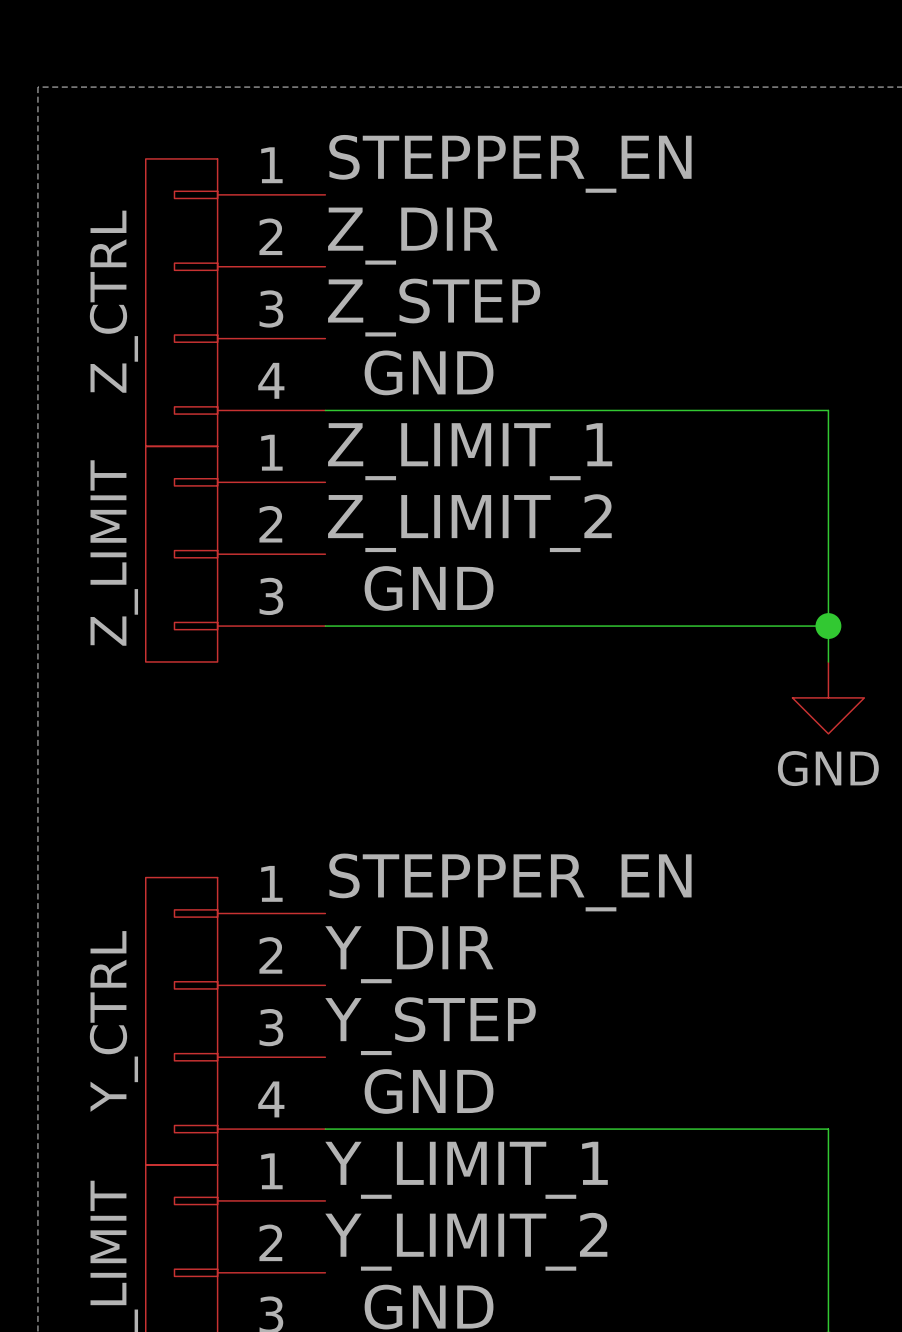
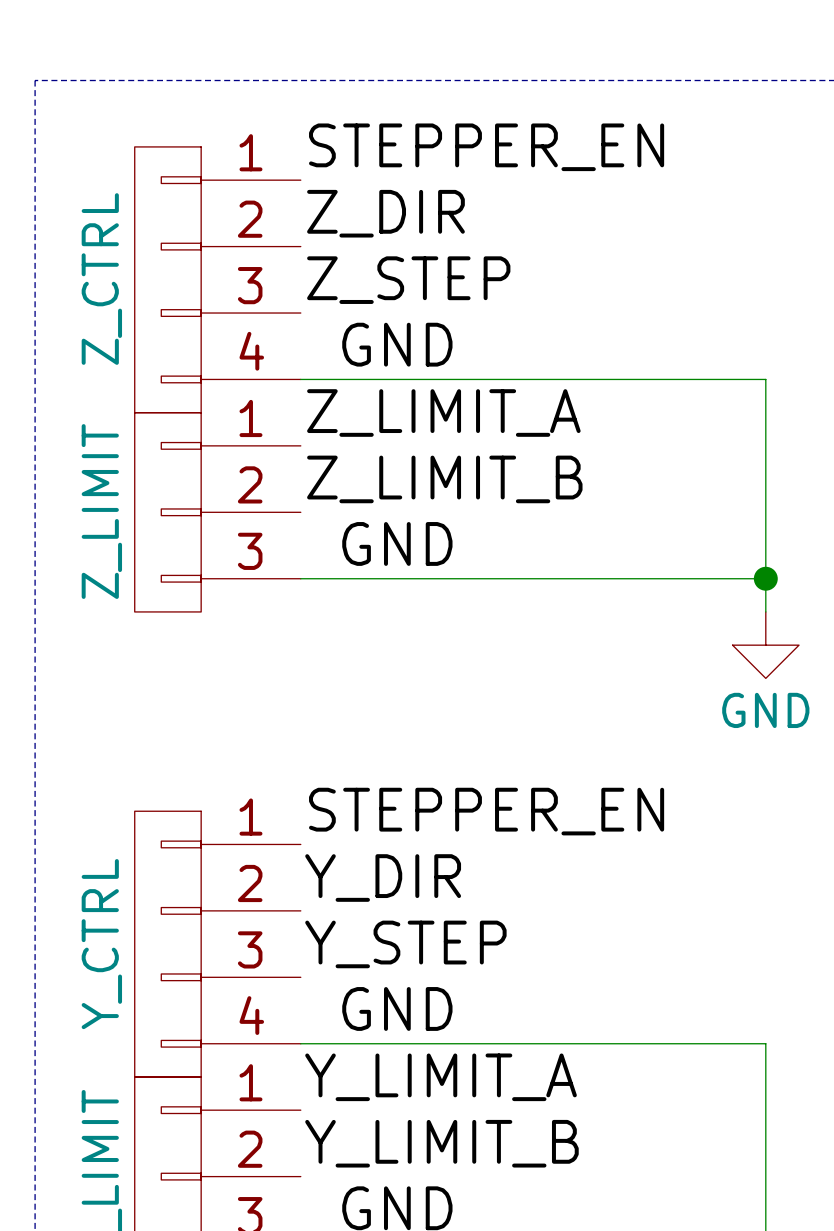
label: Z_LIMIT_1 (470, 451) -> Z_LIMIT_A (443, 413)
label: Z_LIMIT_2 (469, 523) -> Z_LIMIT_B (444, 479)
label: Y_LIMIT_1 (466, 1170) -> Y_LIMIT_A (441, 1077)
label: Y_LIMIT_2 (466, 1241) -> Y_LIMIT_B (441, 1143)

